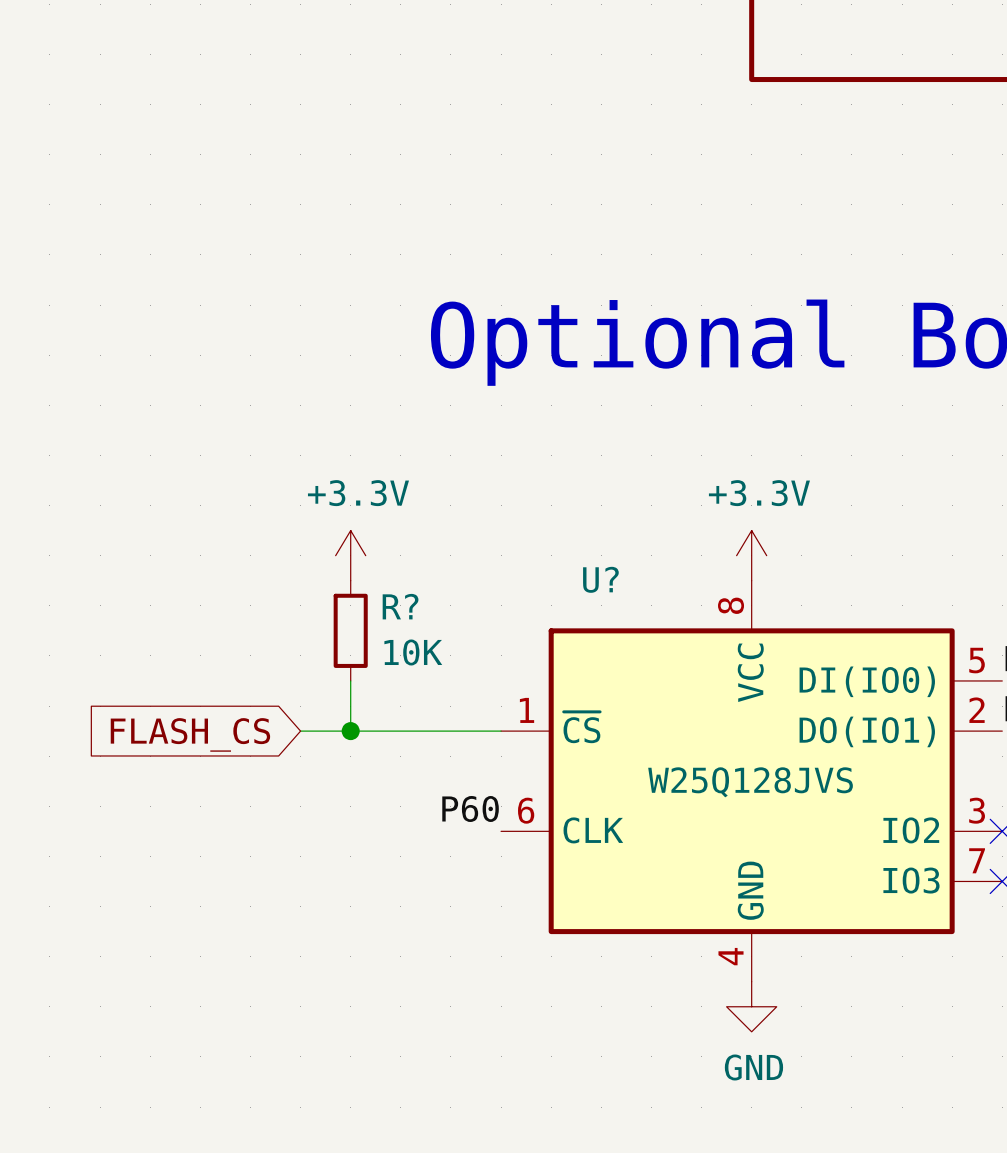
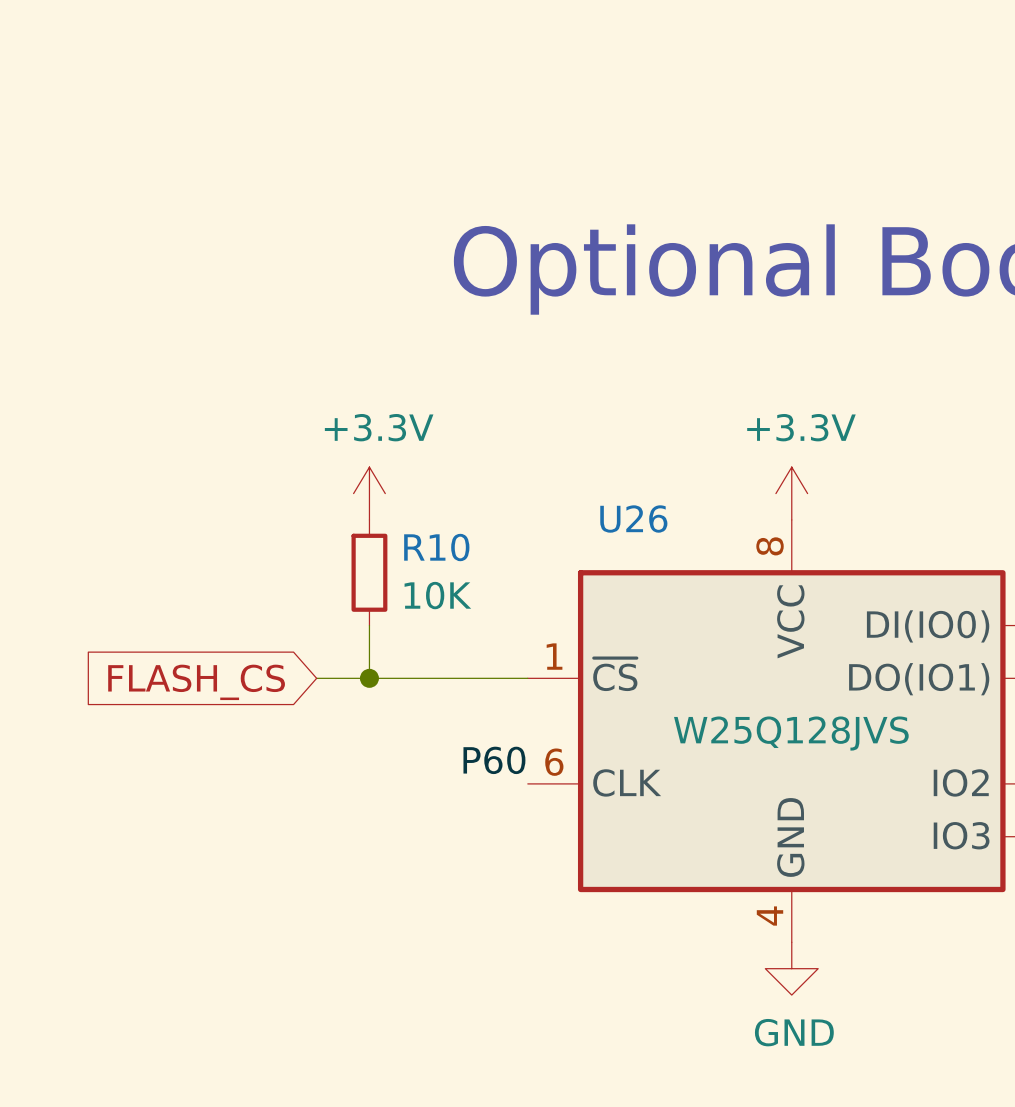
U? name: U? (600, 579) -> U26 (633, 519)
R? name: R? (400, 606) -> R10 (436, 547)

